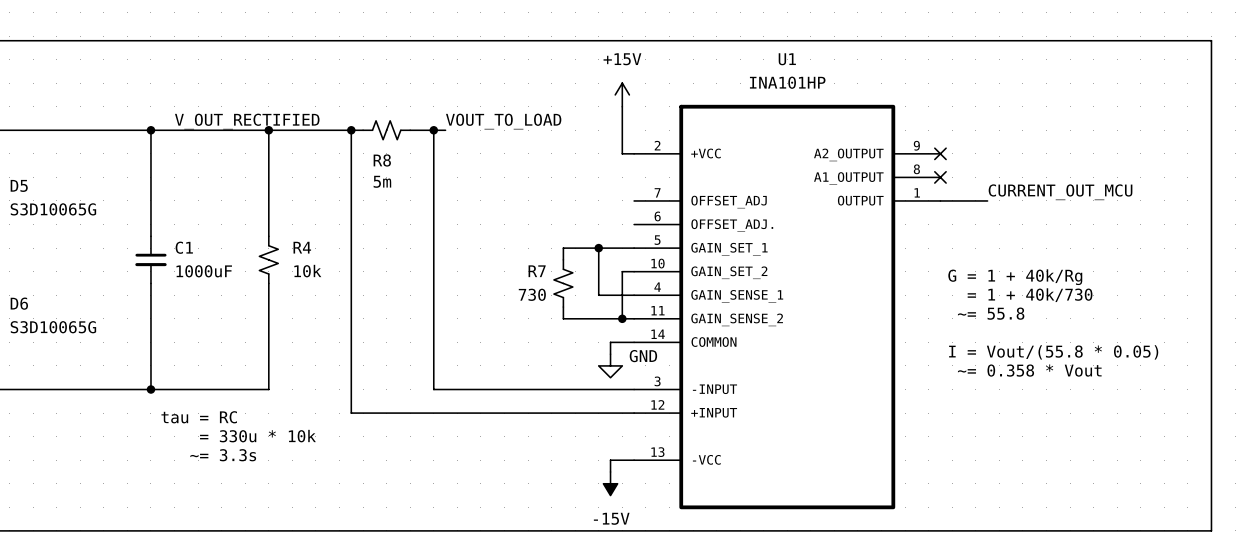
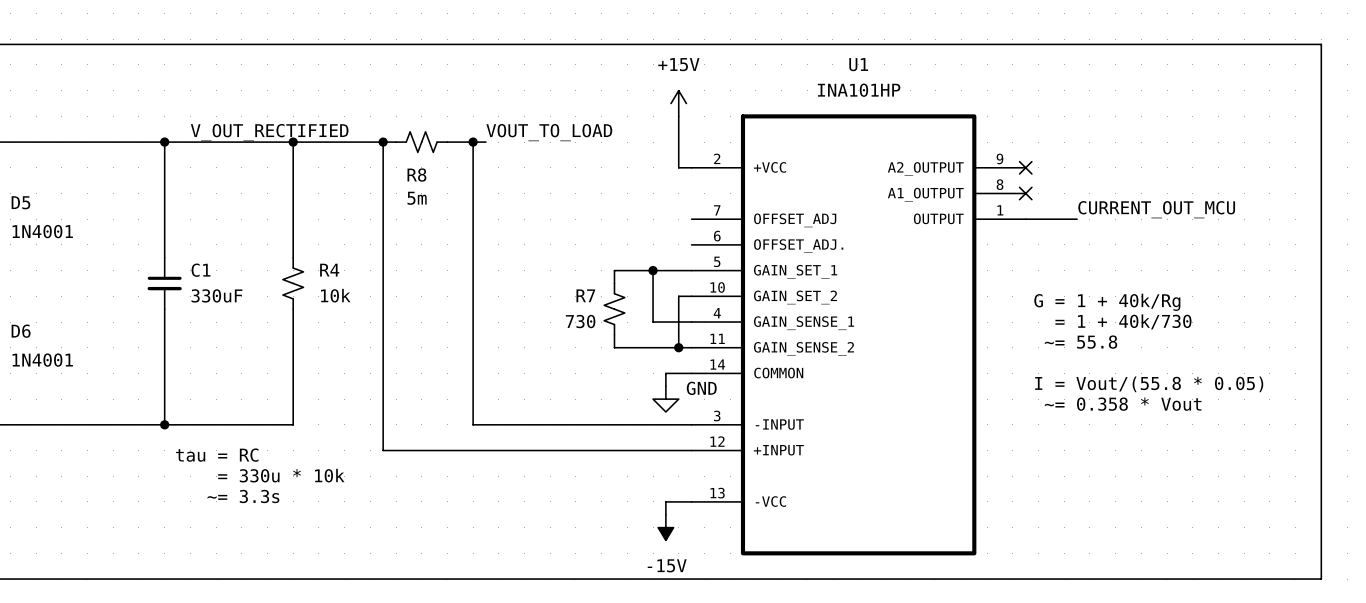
D5 value: S3D10065G (53, 209) -> 1N4001 (42, 231)
C1 value: 1000uF (204, 271) -> 330uF (216, 295)
D6 value: S3D10065G (53, 327) -> 1N4001 (42, 360)

